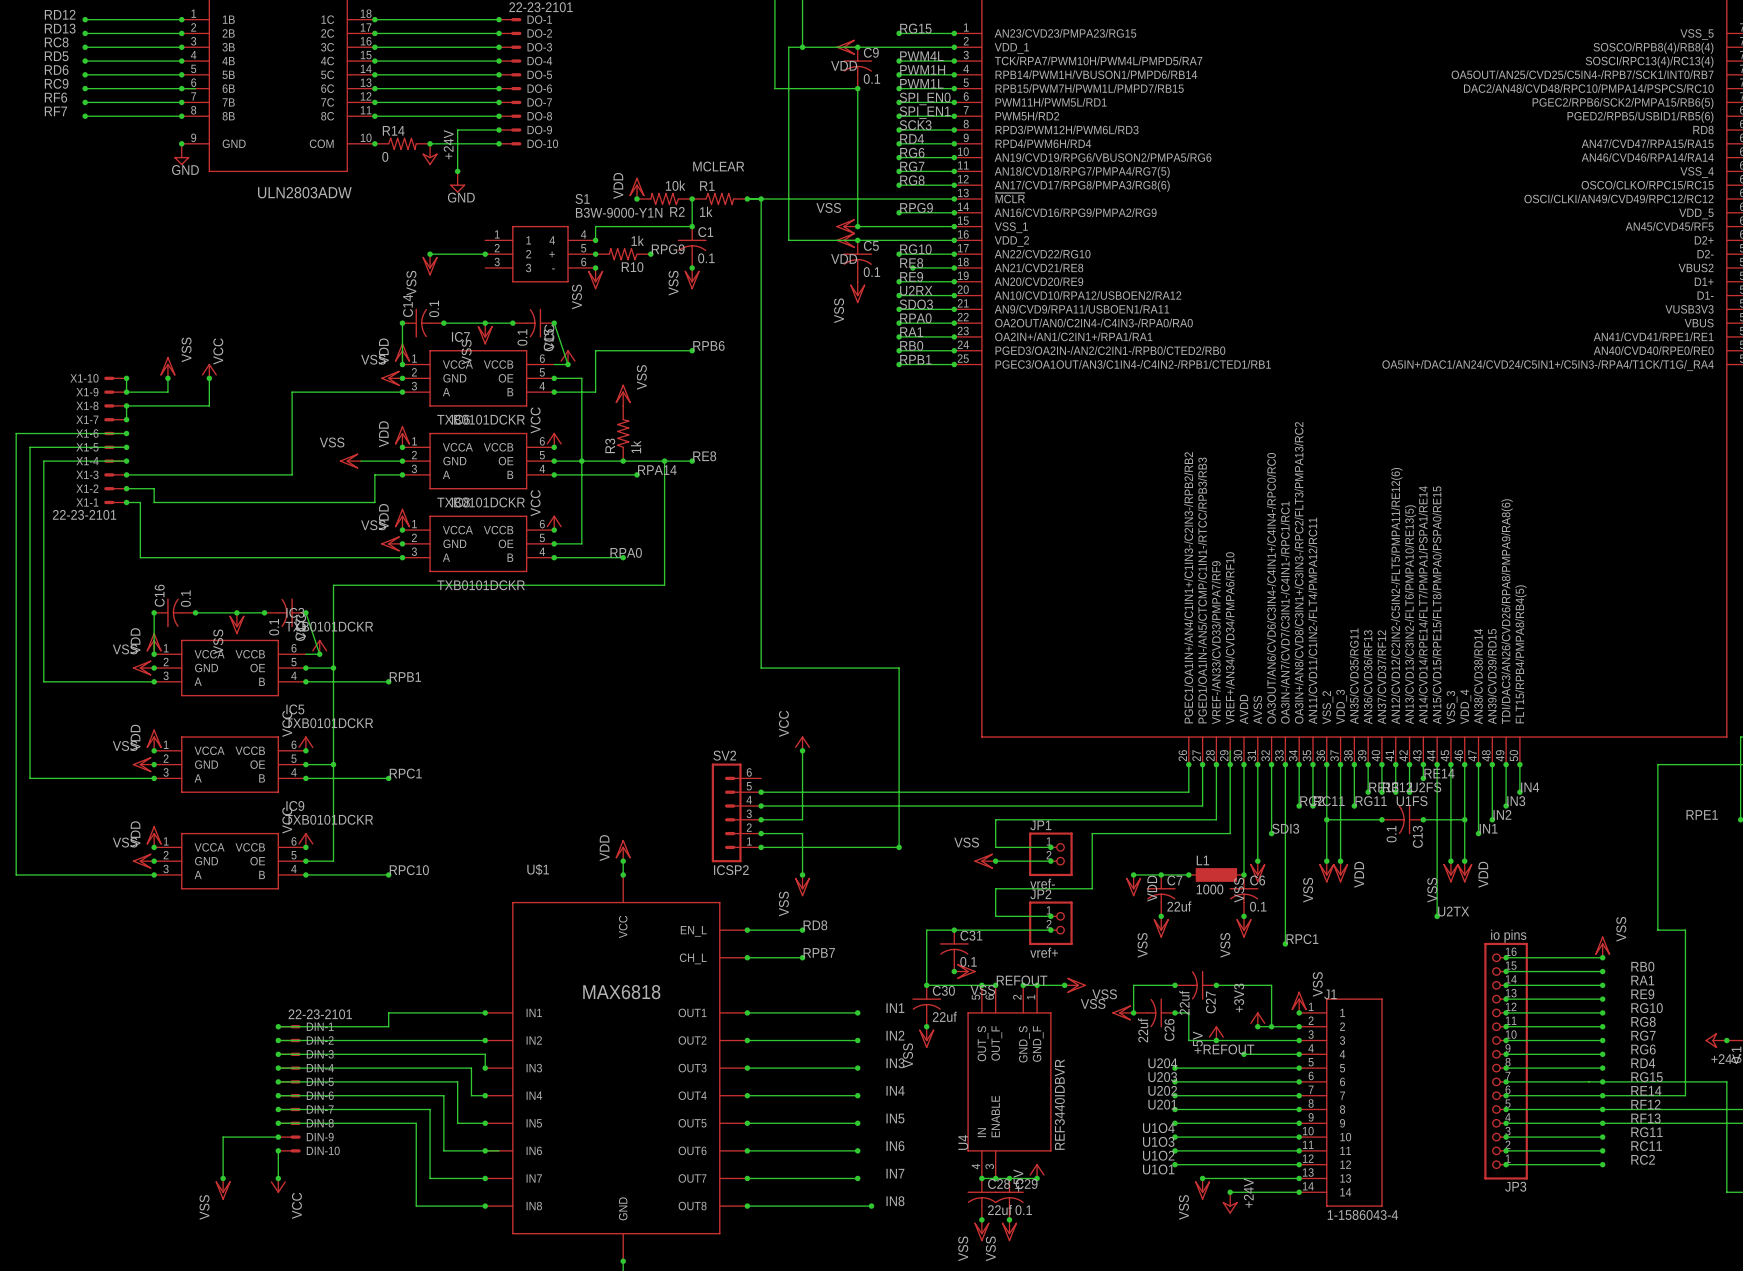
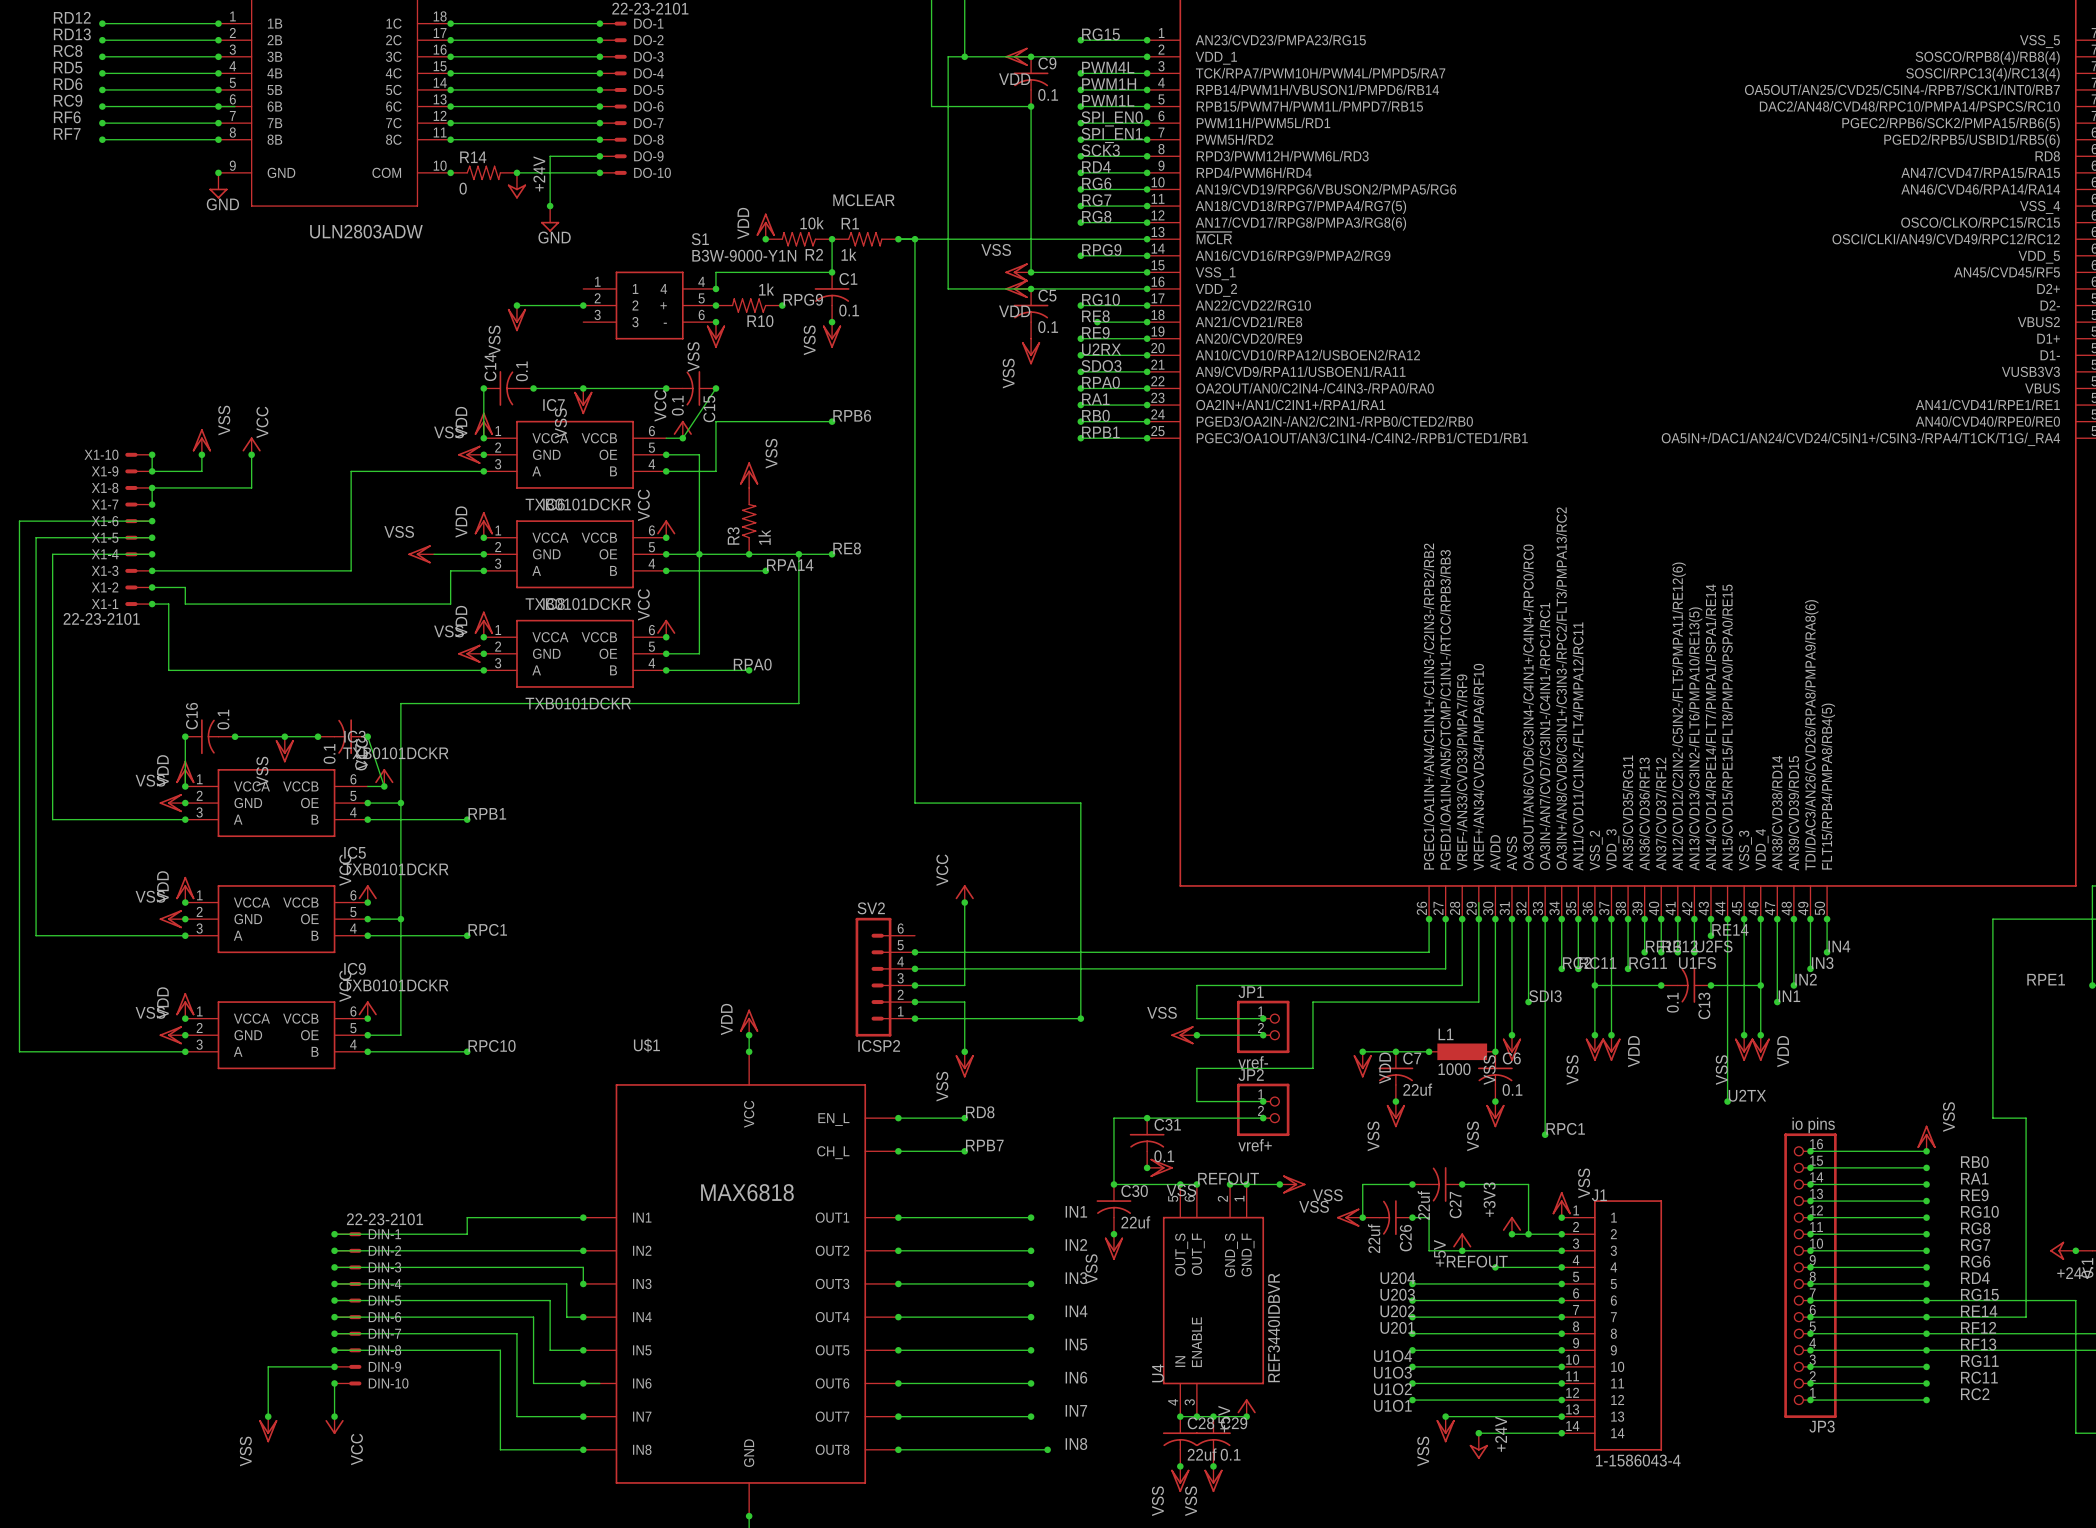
junction: (512, 323) -> none
C15 position: (533, 323) -> (691, 388)
wire: (554, 323) (568, 364) -> (715, 388) (682, 438)
junction: none -> (715, 388)

